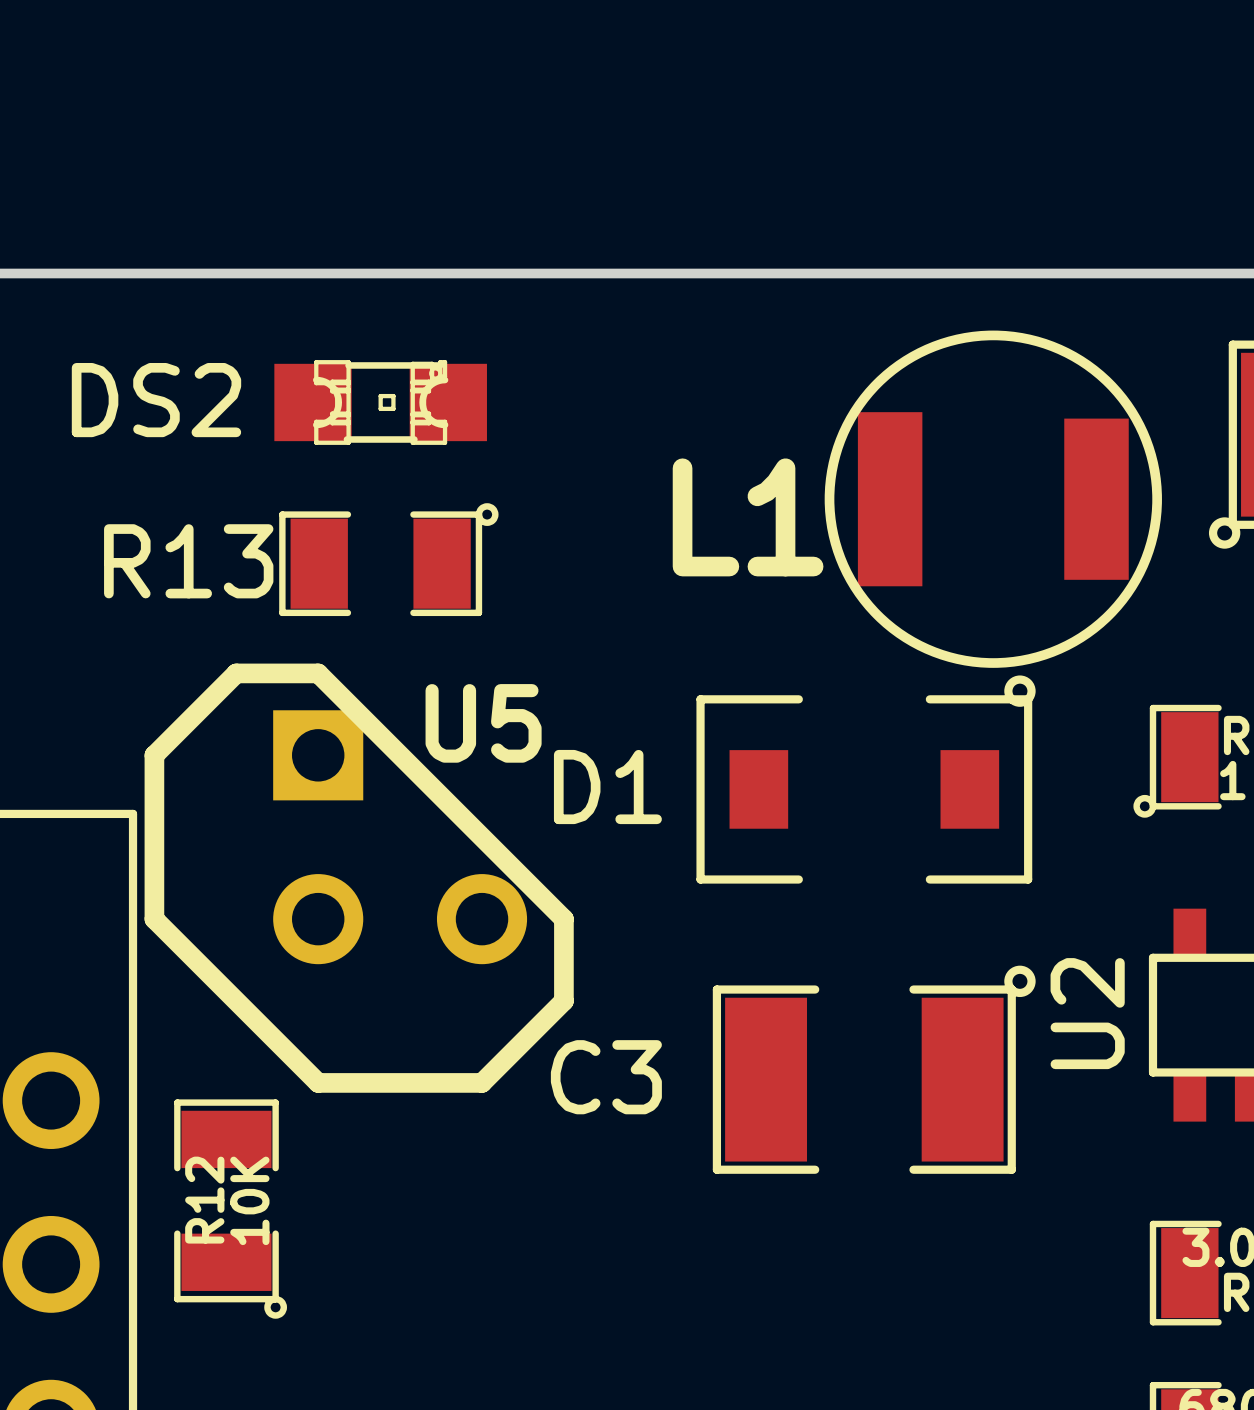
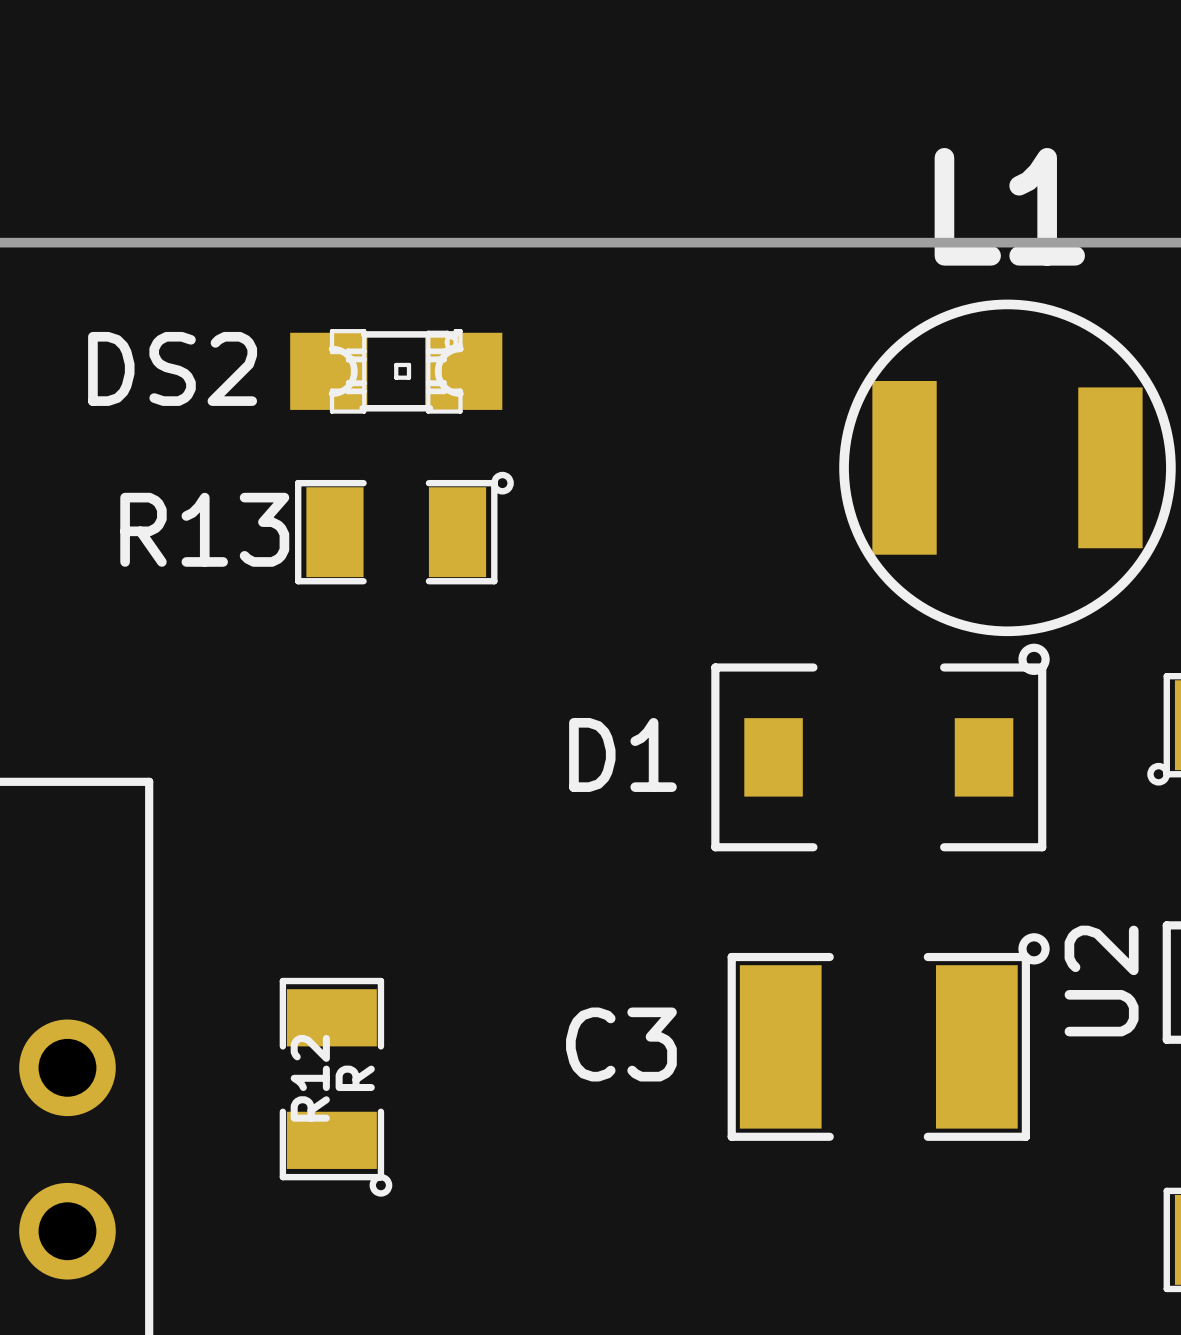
L1 name position: L1 (748, 517) -> L1 (1009, 206)
U5: (359, 878) -> none
R12 value: 10K (249, 1200) -> R (355, 1078)
R12 position: (230, 1209) -> (335, 1087)

